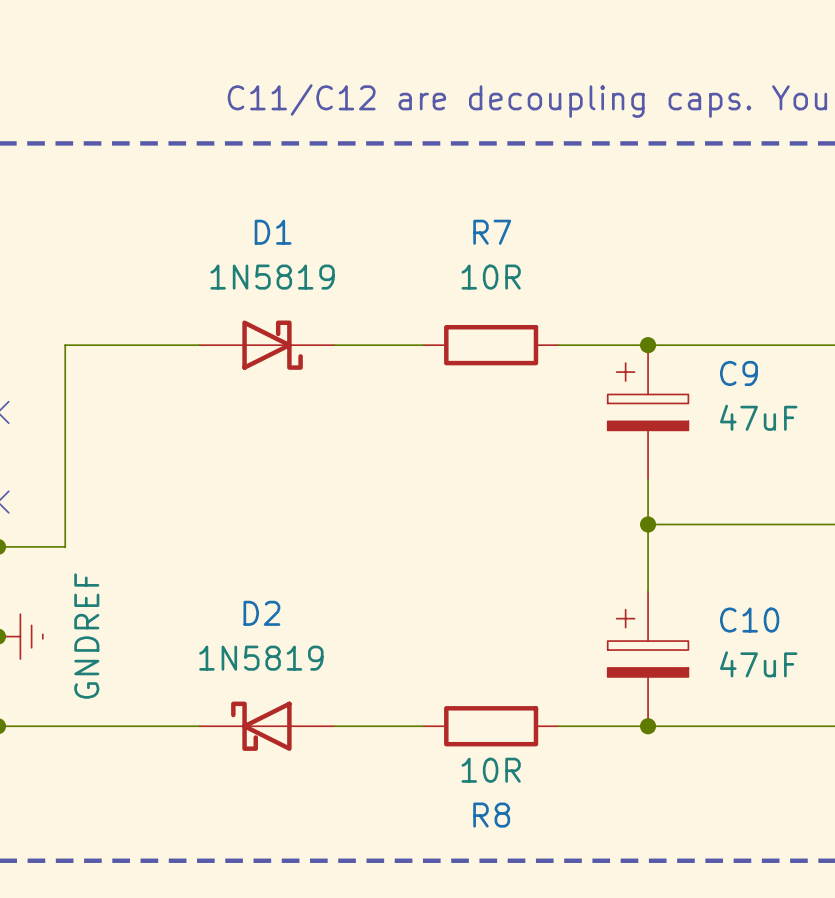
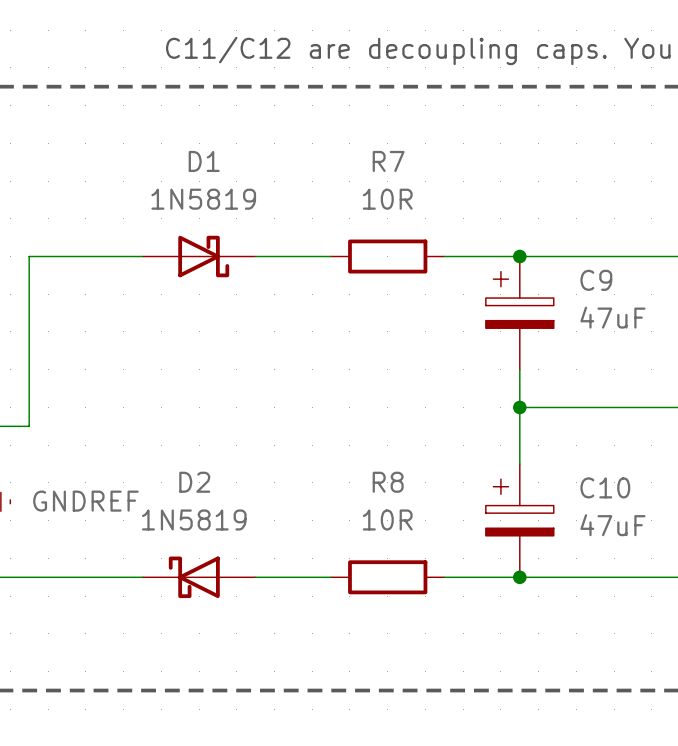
power symbol text rotation: 0° (86, 636) -> 90° clockwise (85, 501)
R8 value position: 10R (491, 770) -> 10R (387, 519)
R8 name position: R8 (491, 815) -> R8 (388, 482)

